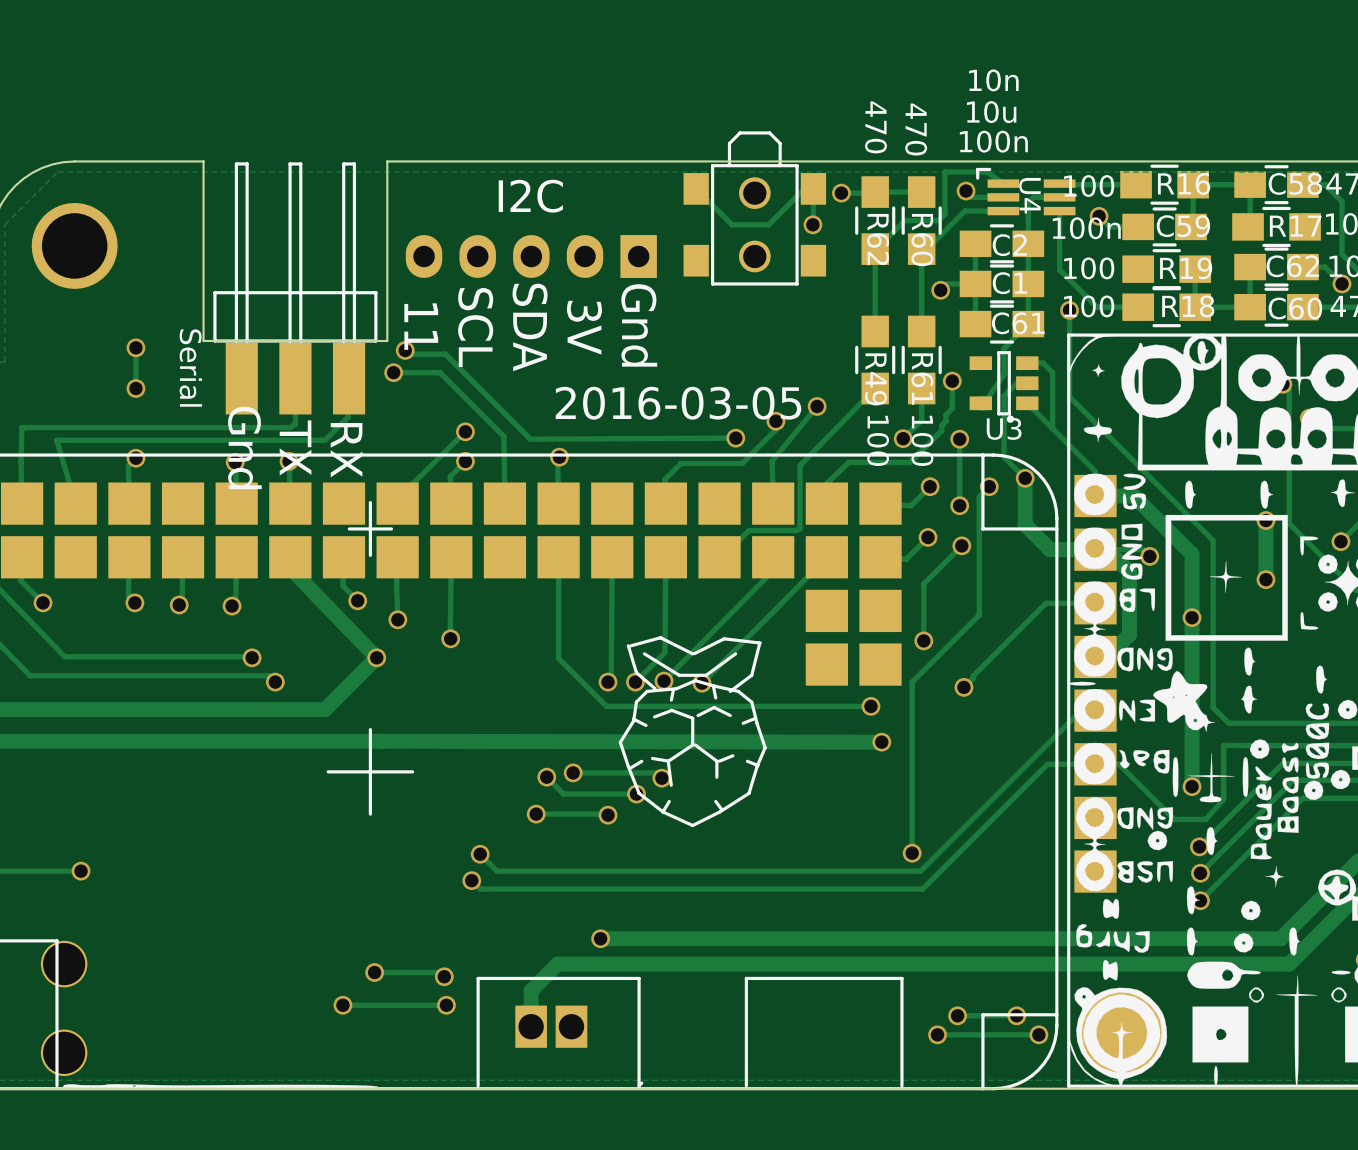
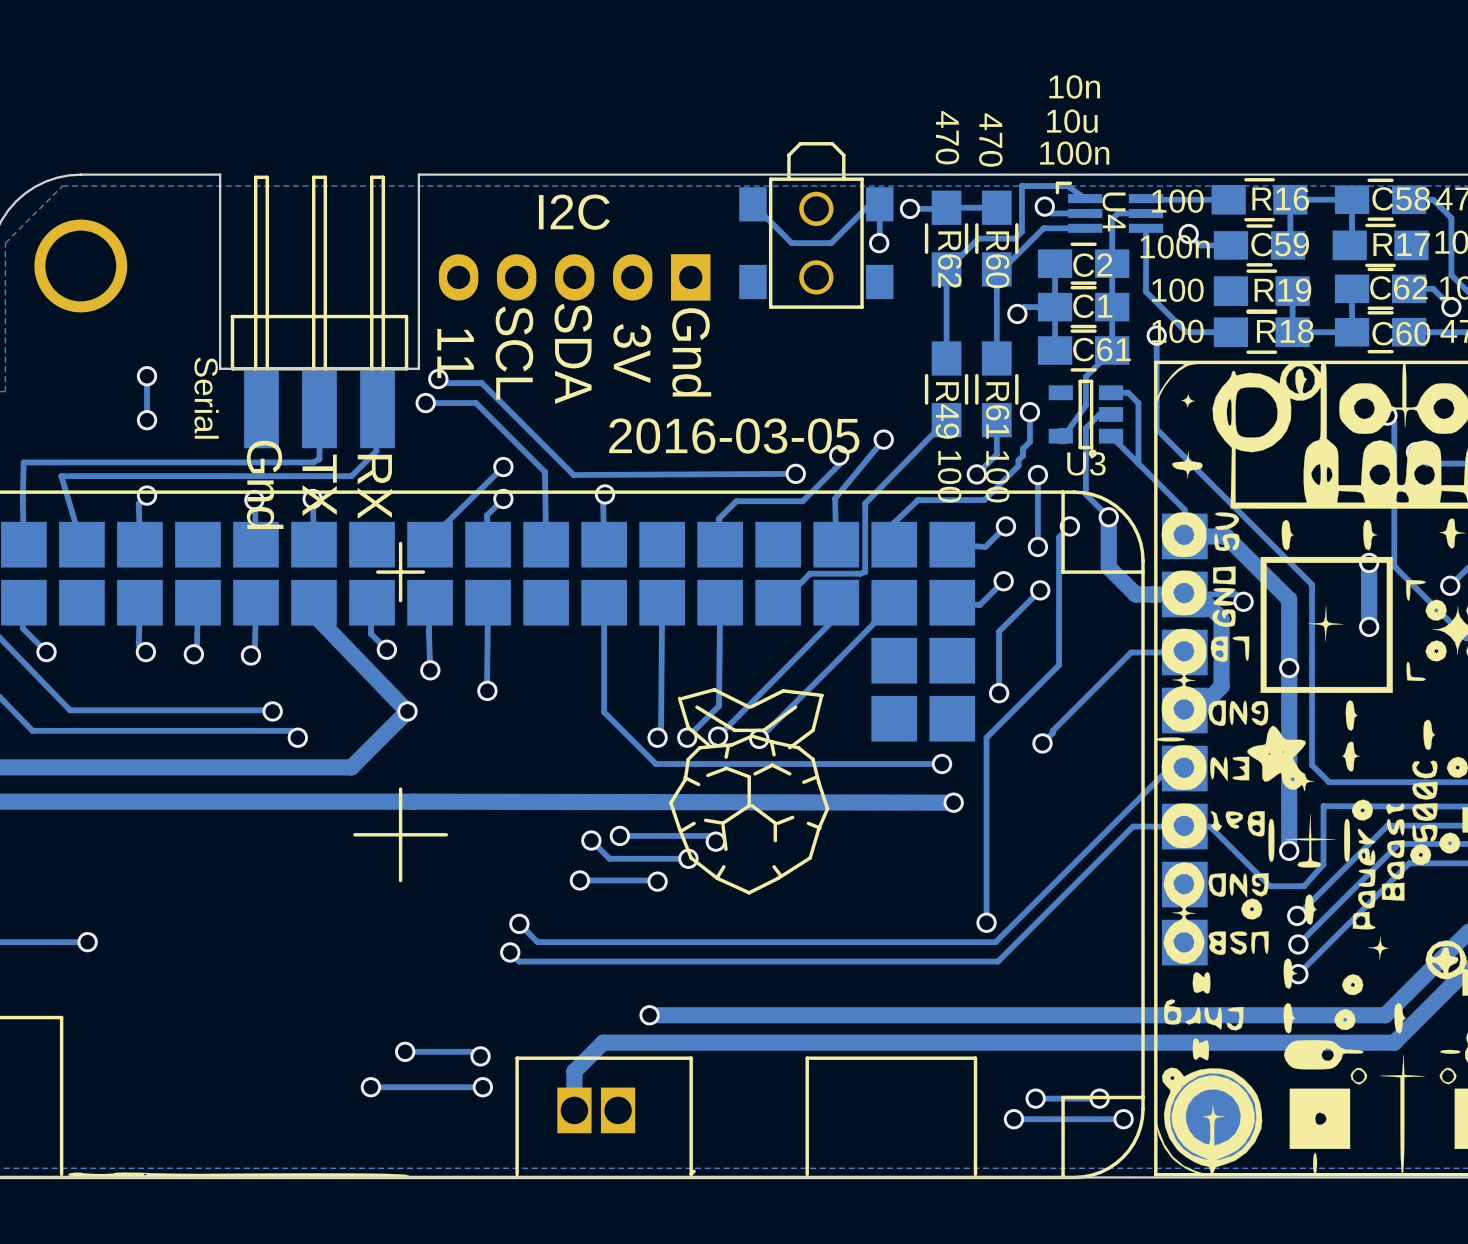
part: (64, 964) -> none
part: (64, 1052) -> none

